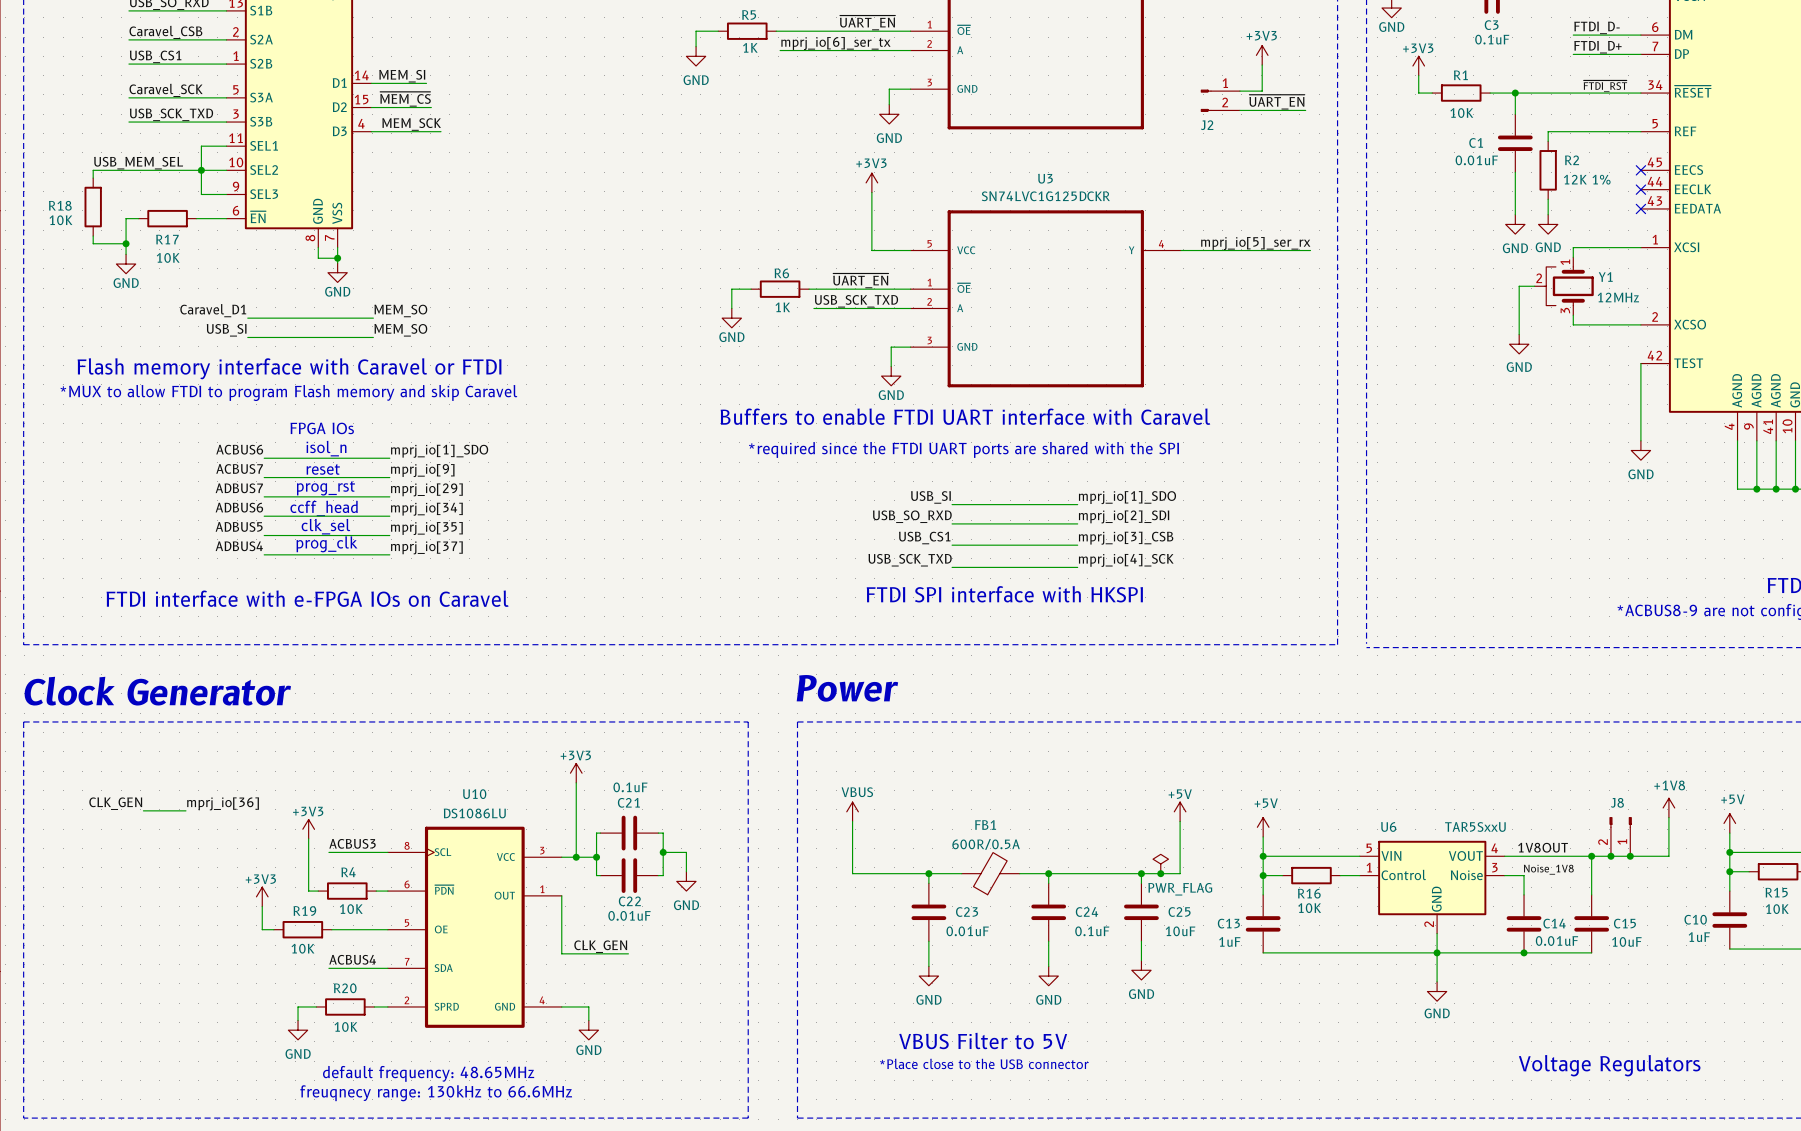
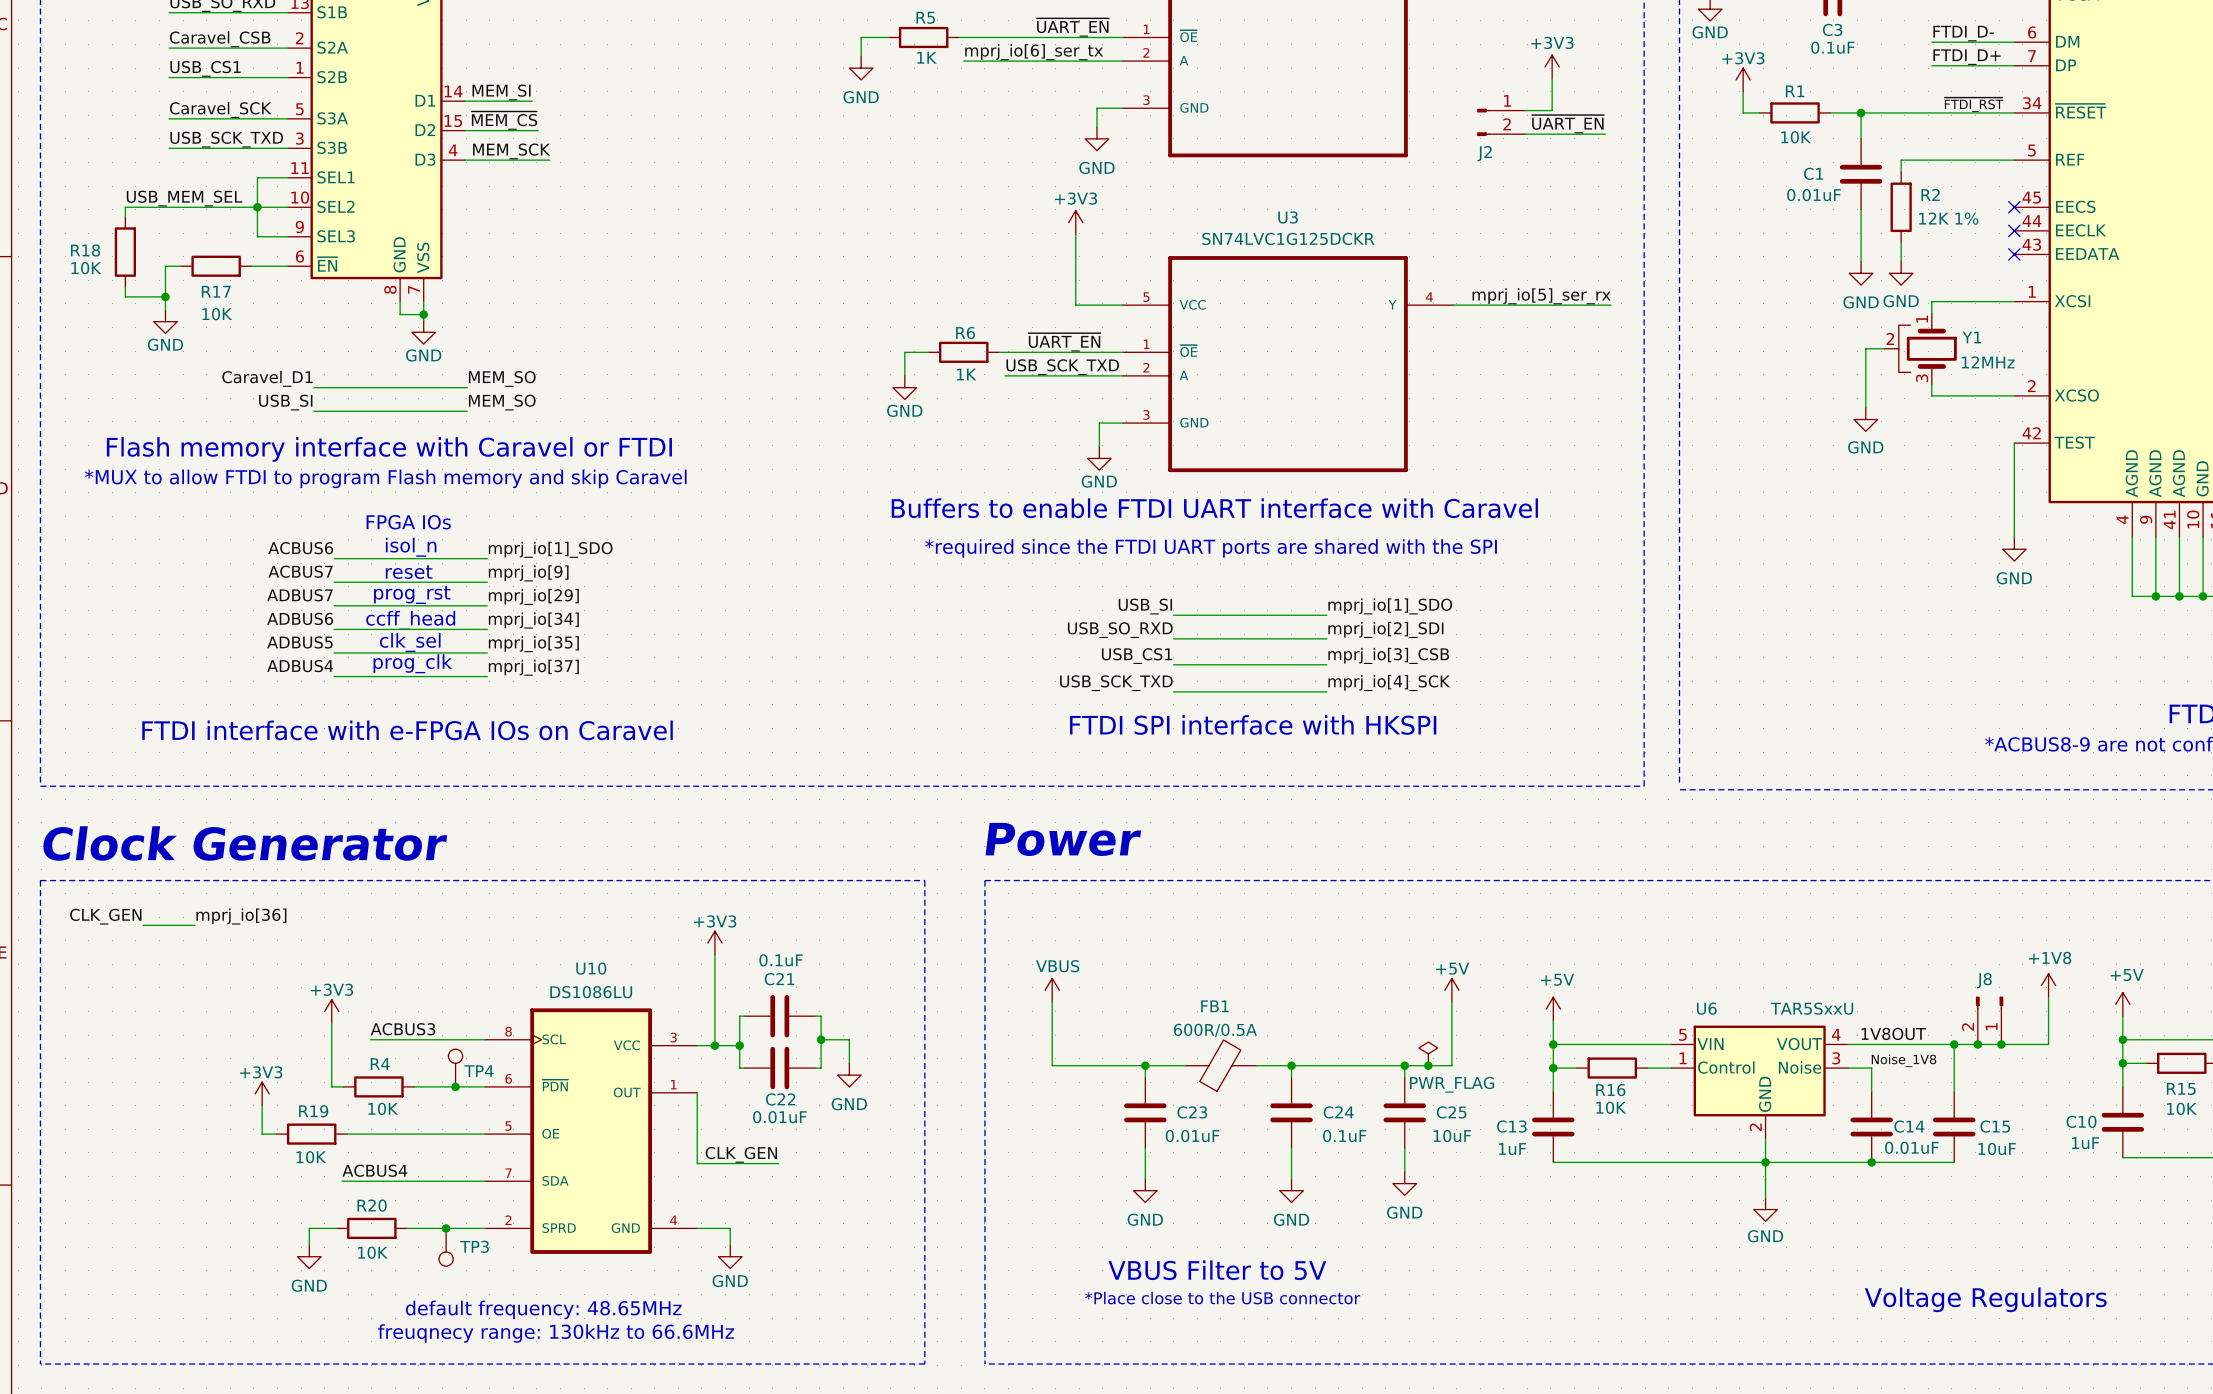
label position: CLK_GEN (115, 803) -> CLK_GEN (105, 916)
label position: mprj_io[36] (223, 803) -> mprj_io[36] (241, 916)
wire: (143, 810) (185, 810) -> (143, 925) (194, 925)
power symbol: none -> +3V3 (331, 1011)
power symbol: +3V3 (308, 829) -> none
wire: (308, 838) (308, 891) (318, 891) -> (331, 1023) (331, 1086) (343, 1086)
label position: ACBUS3 (352, 843) -> ACBUS3 (402, 1029)
wire: none -> (370, 1039) (413, 1039)
TP4: none -> (455, 1068)
wire: none -> (414, 1086) (470, 1086)
R4 position: (347, 891) -> (378, 1086)
junction: none -> (455, 1086)
power symbol: none -> +3V3 (262, 1093)
power symbol: +3V3 (262, 896) -> none
wire: (262, 906) (262, 929) (273, 929) -> (262, 1105) (262, 1134) (276, 1134)
wire: none -> (347, 1134) (416, 1134)
R19 position: (302, 929) -> (311, 1134)
label position: ACBUS4 (352, 959) -> ACBUS4 (374, 1170)
wire: none -> (342, 1181) (413, 1181)
wire: none -> (336, 1228) (309, 1228) (309, 1244)
wire: (316, 1006) (298, 1006) (298, 1020) -> none
wire: none -> (407, 1228) (468, 1228)
R20 position: (345, 1006) -> (371, 1228)
junction: none -> (446, 1228)
TP3: none -> (446, 1247)
power symbol position: GND (298, 1030) -> GND (309, 1256)

